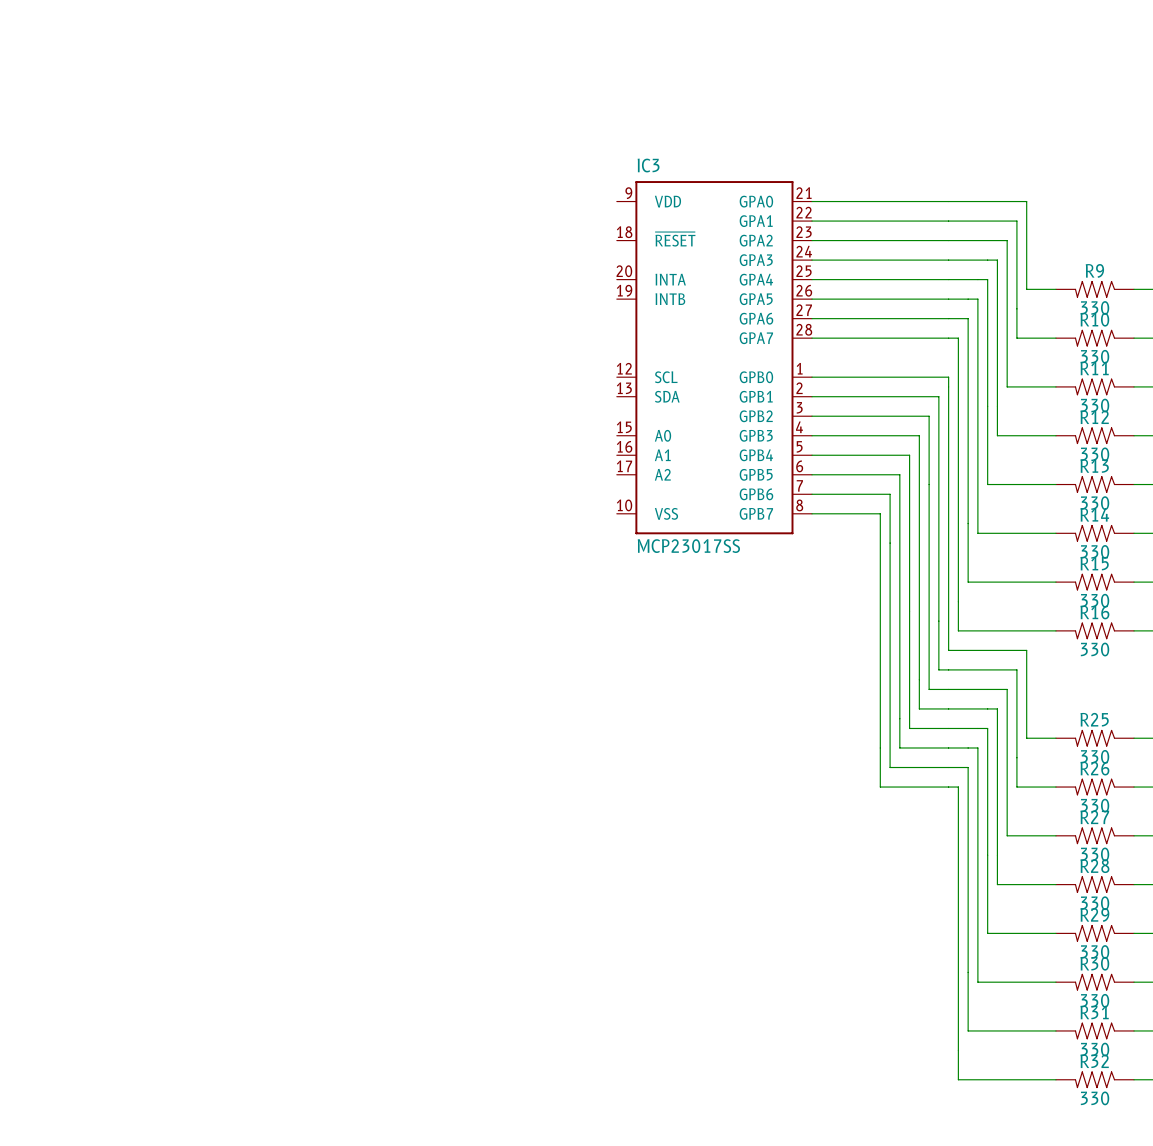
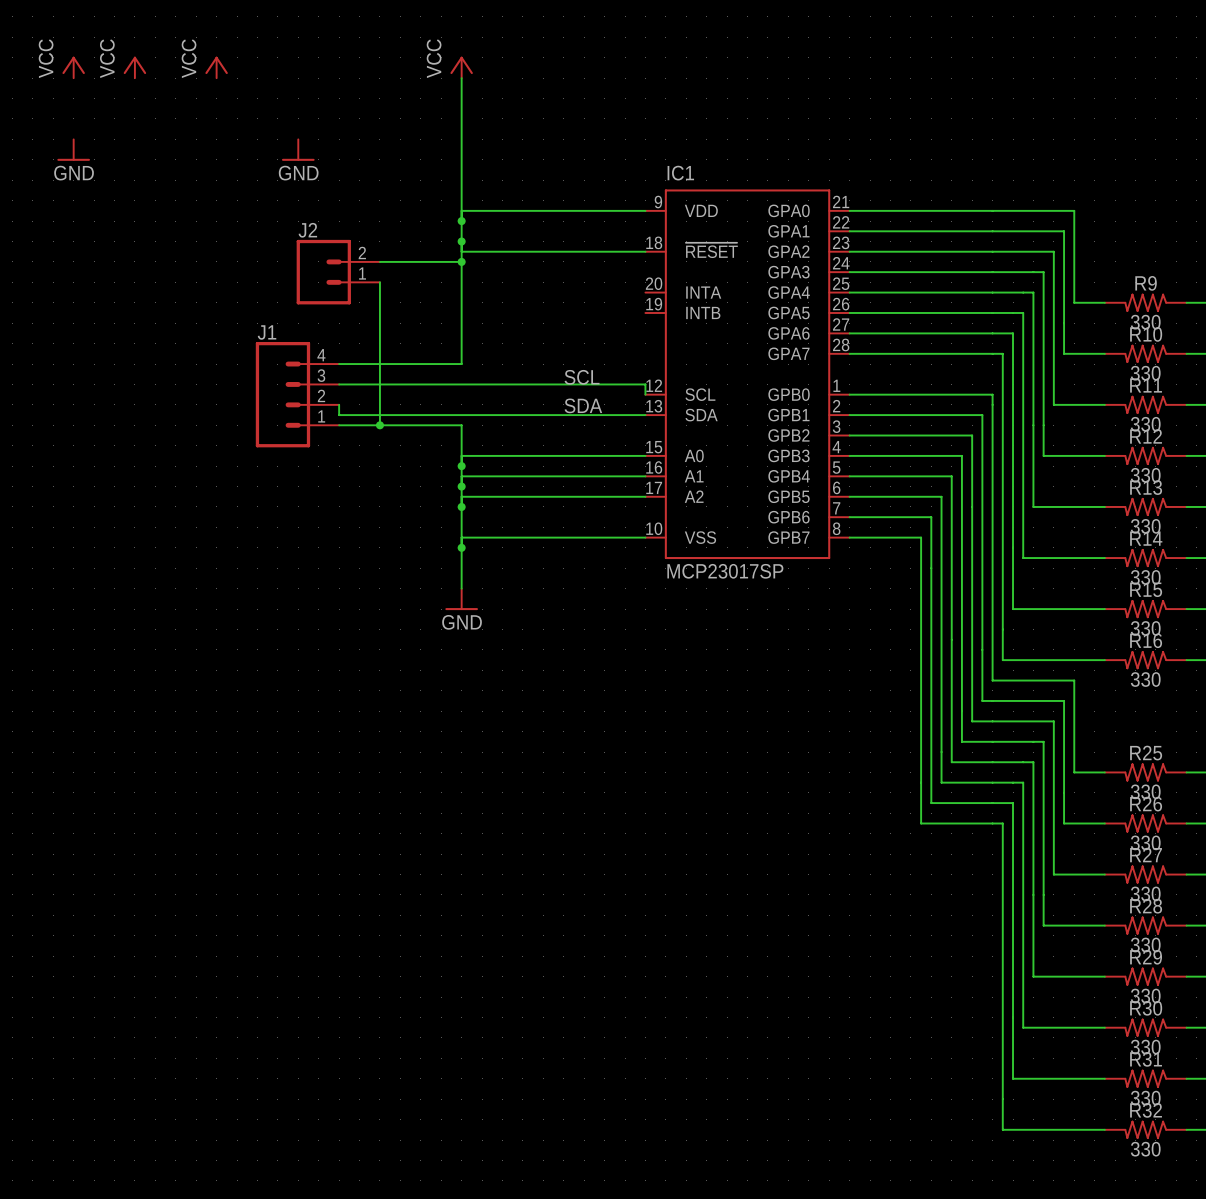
power symbol: none -> VCC (73, 67)
power symbol: none -> VCC (134, 67)
power symbol: none -> VCC (216, 67)
power symbol: none -> VCC (461, 67)
wire: none -> (461, 78) (461, 364) (339, 364)
power symbol: none -> GND (73, 150)
power symbol: none -> GND (298, 150)
IC3 name: IC3 (648, 165) -> IC1 (680, 173)
wire: none -> (461, 210) (645, 210)
junction: none -> (461, 221)
junction: none -> (461, 241)
wire: none -> (461, 251) (645, 251)
wire: none -> (379, 261) (461, 261)
junction: none -> (461, 261)
J2: none -> (338, 272)
wire: none -> (379, 282) (379, 425)
label: none -> SCL (582, 377)
wire: none -> (339, 384) (645, 384) (645, 394)
J1: none -> (297, 394)
wire: none -> (339, 404) (339, 415) (645, 415)
label: none -> SDA (583, 405)
wire: none -> (339, 425) (461, 425) (461, 588)
junction: none -> (379, 425)
wire: none -> (461, 455) (645, 455)
junction: none -> (461, 466)
wire: none -> (461, 476) (645, 476)
junction: none -> (461, 486)
wire: none -> (461, 496) (645, 496)
junction: none -> (461, 506)
wire: none -> (461, 537) (645, 537)
junction: none -> (461, 547)
IC3 value: MCP23017SS (688, 546) -> MCP23017SP (725, 571)
power symbol: none -> GND (461, 599)

